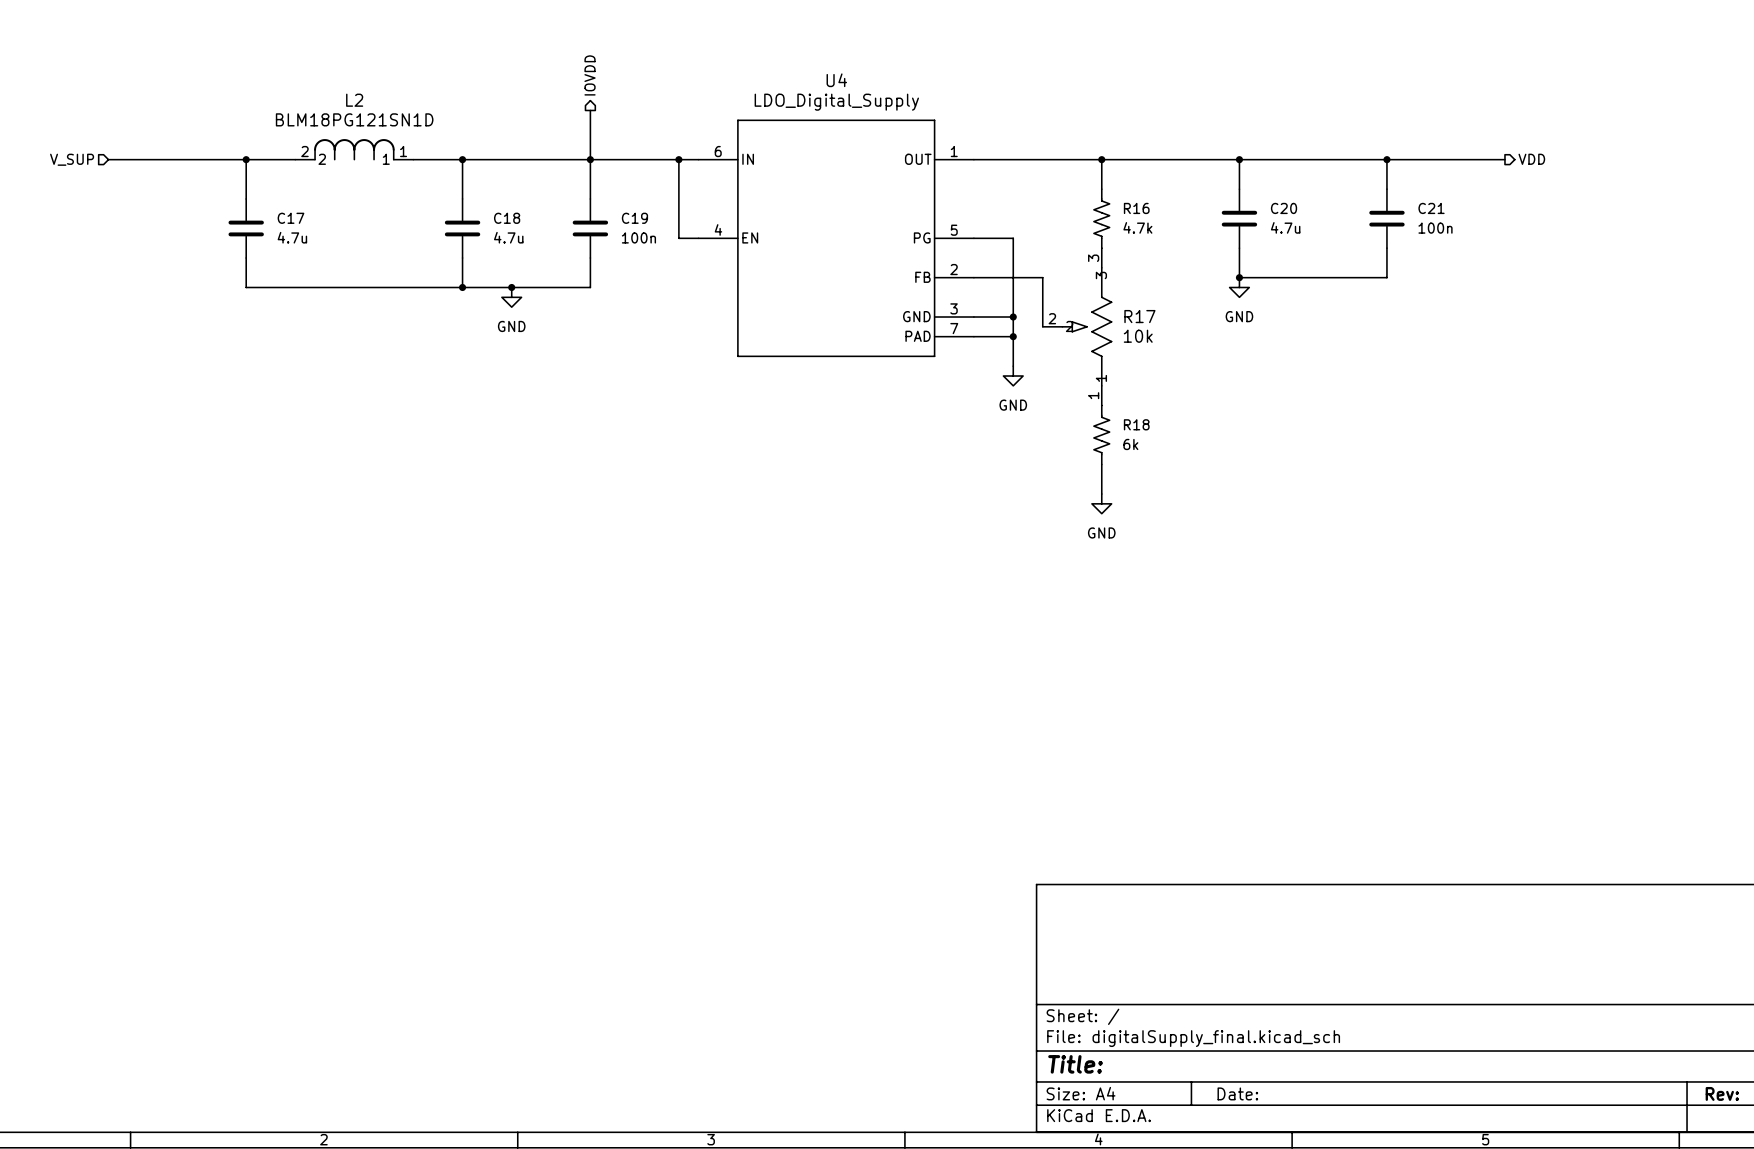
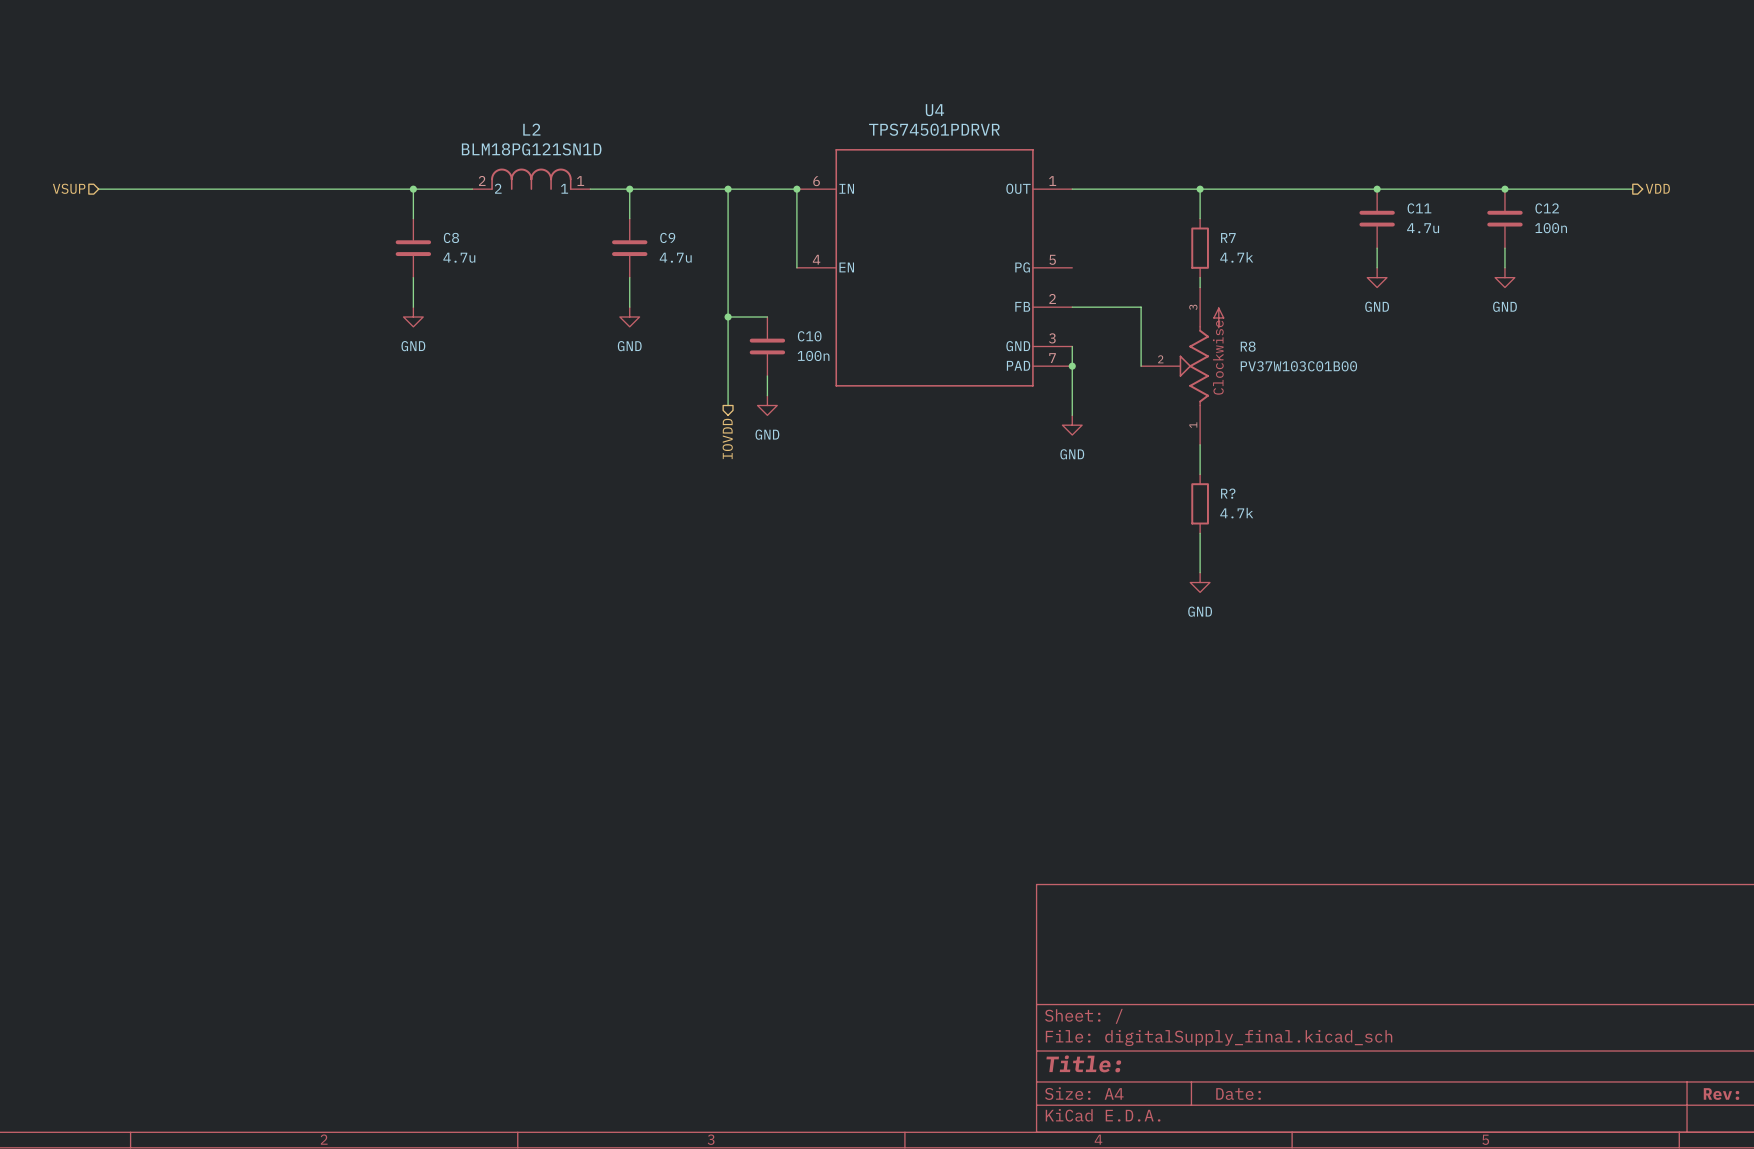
hierarchical label: IOVDD (590, 75) -> none
U4 value: LDO_Digital_Supply (836, 102) -> TPS74501PDRVR (934, 129)
wire: (590, 110) (590, 198) -> none
L2 position: (354, 149) -> (531, 179)
hierarchical label: V_SUP (72, 159) -> none
wire: (108, 159) (295, 159) -> none
wire: (246, 159) (246, 198) -> none
junction: (246, 159) -> none
wire: (413, 159) (698, 159) -> none
wire: (462, 159) (462, 198) -> none
junction: (462, 159) -> none
junction: (590, 159) -> none
wire: (678, 159) (678, 238) (698, 238) -> none
junction: (678, 159) -> none
wire: (973, 159) (1504, 159) -> none
wire: (1101, 159) (1101, 189) -> none
junction: (1101, 159) -> none
wire: (1239, 159) (1239, 189) -> (1200, 189) (1200, 218)
junction: (1239, 159) -> none
wire: (1386, 159) (1386, 189) -> none
junction position: (1386, 159) -> (1377, 189)
hierarchical label position: VDD (1531, 159) -> VDD (1657, 188)
hierarchical label: none -> VSUP (69, 188)
wire: none -> (98, 189) (472, 189)
wire: none -> (413, 189) (413, 218)
junction: none -> (413, 189)
wire: none -> (590, 189) (796, 189) (796, 267)
wire: none -> (629, 189) (629, 218)
junction: none -> (629, 189)
wire: none -> (728, 189) (728, 405)
junction: none -> (728, 189)
junction: none -> (796, 189)
wire: none -> (1072, 189) (1632, 189)
junction: none -> (1200, 189)
junction: none -> (1504, 189)
R16: 4.7k (1101, 218) -> none
C20: 4.7u (1239, 218) -> none
C11: none -> 4.7u (1377, 218)
C21: 100n (1386, 218) -> none
C12: none -> 100n (1504, 218)
C17: 4.7u (246, 228) -> none
C18: 4.7u (462, 228) -> none
C19: 100n (590, 228) -> none
U4 position: (836, 238) -> (934, 267)
wire: (973, 238) (1013, 238) (1013, 366) -> none
C8: none -> 4.7u (413, 248)
C9: none -> 4.7u (629, 248)
R7: none -> 4.7k (1200, 248)
wire: (1239, 248) (1239, 277) (1386, 277) (1386, 248) -> none
wire: none -> (1377, 248) (1377, 267)
wire: none -> (1504, 248) (1504, 267)
wire: (246, 257) (246, 287) (590, 287) (590, 257) -> none
wire: (462, 257) (462, 287) -> (413, 277) (413, 307)
wire: none -> (629, 277) (629, 307)
wire: (973, 277) (1042, 277) (1042, 326) -> none
wire: none -> (1200, 277) (1200, 287)
junction: (1239, 277) -> none
power symbol: none -> GND (1377, 277)
power symbol: none -> GND (1504, 277)
junction: (462, 287) -> none
junction: (511, 287) -> none
power symbol: GND (1239, 287) -> none
power symbol: GND (511, 297) -> none
wire: none -> (1072, 307) (1141, 307) (1141, 366)
power symbol: none -> GND (413, 317)
power symbol: none -> GND (629, 317)
wire: none -> (728, 317) (767, 317)
junction: none -> (728, 317)
wire: (973, 317) (1013, 317) -> none
junction: (1013, 317) -> none
R17: 10k (1077, 326) -> none
wire: (973, 336) (1013, 336) -> none
junction: (1013, 336) -> none
C10: none -> 100n (767, 346)
wire: none -> (1072, 346) (1072, 415)
junction: none -> (1072, 366)
R8: none -> PV37W103C01B00 (1182, 366)
wire: none -> (767, 376) (767, 395)
power symbol: GND (1013, 376) -> none
power symbol: none -> GND (767, 405)
power symbol: none -> GND (1072, 425)
R18: 6k (1101, 435) -> none
hierarchical label: none -> IOVDD (727, 438)
wire: (1101, 464) (1101, 494) -> (1200, 444) (1200, 474)
power symbol: GND (1101, 503) -> none
R?: none -> 4.7k (1200, 503)
wire: none -> (1200, 533) (1200, 572)
power symbol: none -> GND (1200, 582)

